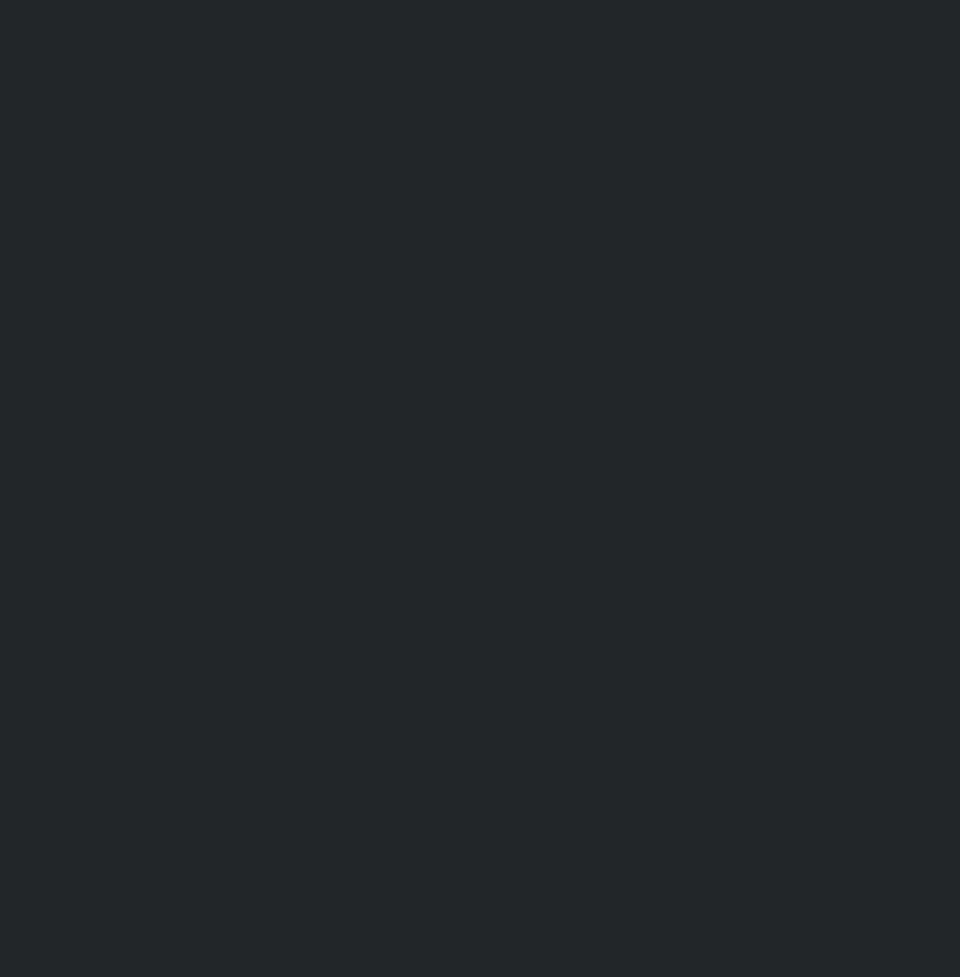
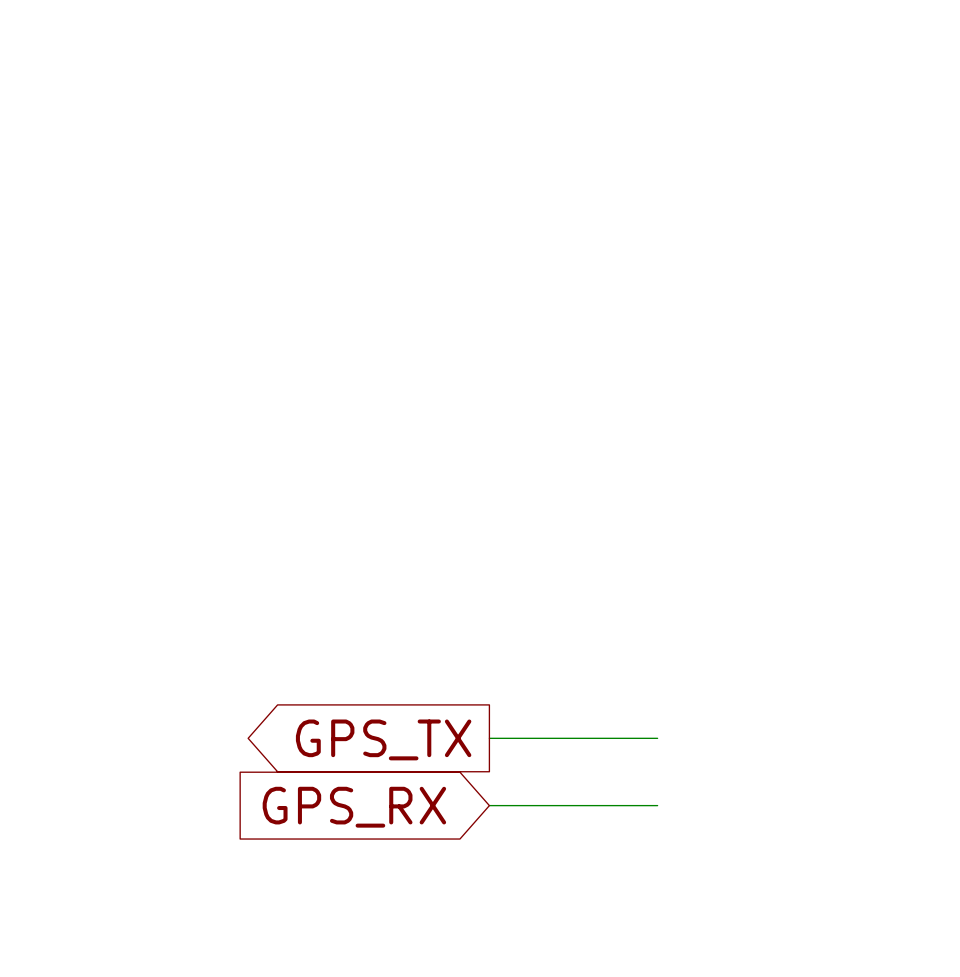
wire: none -> (489, 738) (657, 738)
global label: none -> GPS_TX (383, 739)
wire: none -> (489, 805) (657, 805)
global label: none -> GPS_RX (354, 807)

